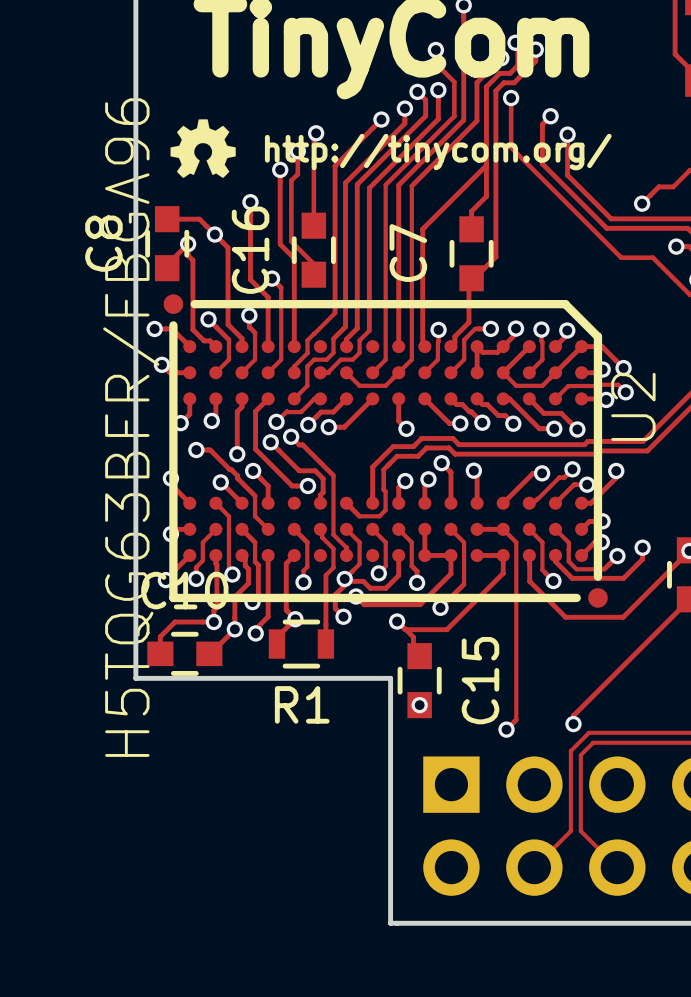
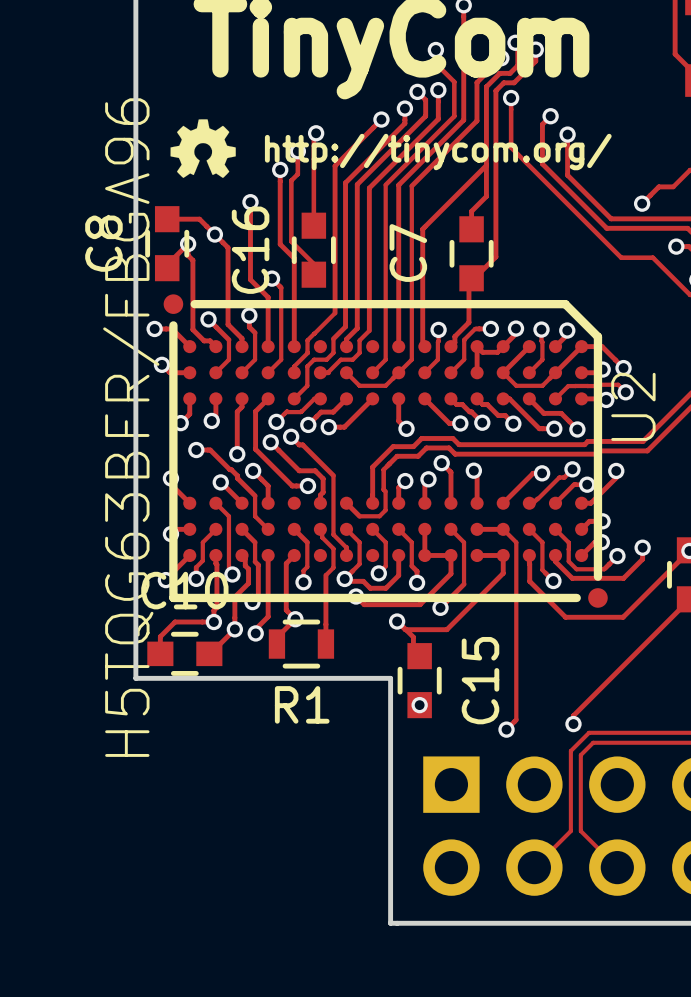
track: (348, 581) (335, 594) (335, 608) (343, 616) -> none
via: (343, 616) -> none

